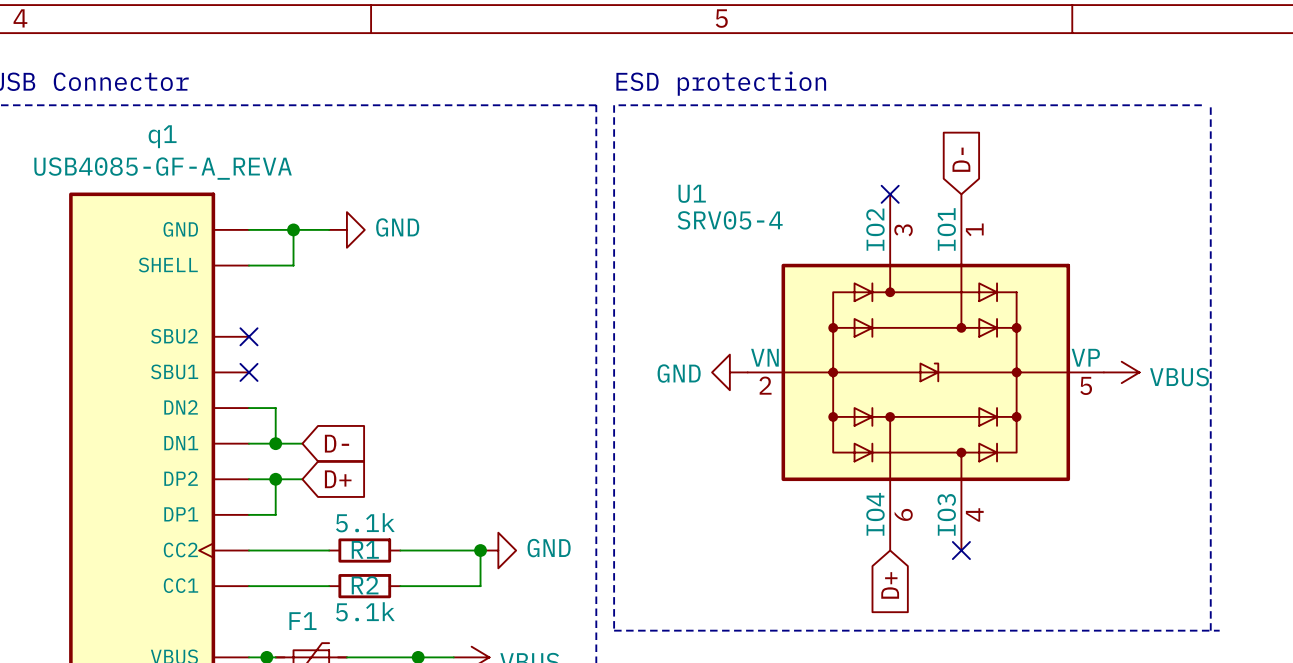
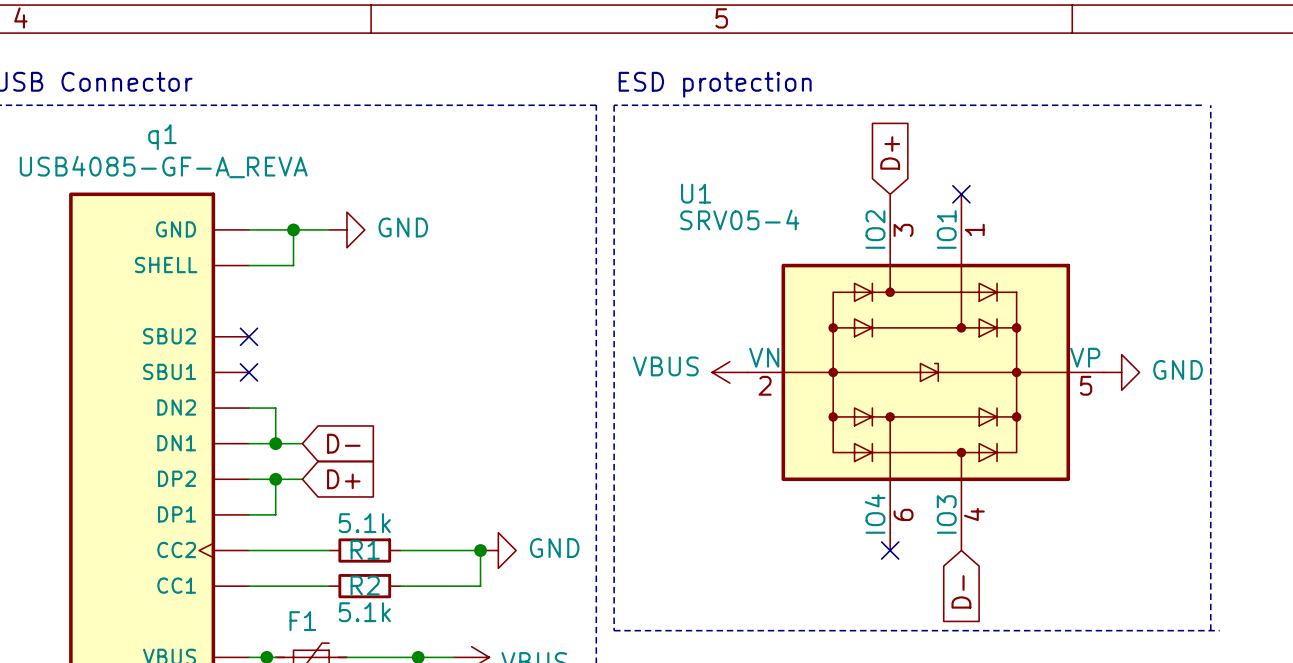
global label: none -> D+ (890, 152)
global label: D- (961, 159) -> none
no-connect mark position: (890, 194) -> (961, 194)
power symbol: GND (729, 372) -> VBUS (729, 372)
power symbol: VBUS (1121, 372) -> GND (1121, 372)
no-connect mark position: (961, 550) -> (890, 550)
global label: D+ (890, 585) -> none
global label: none -> D- (961, 591)

